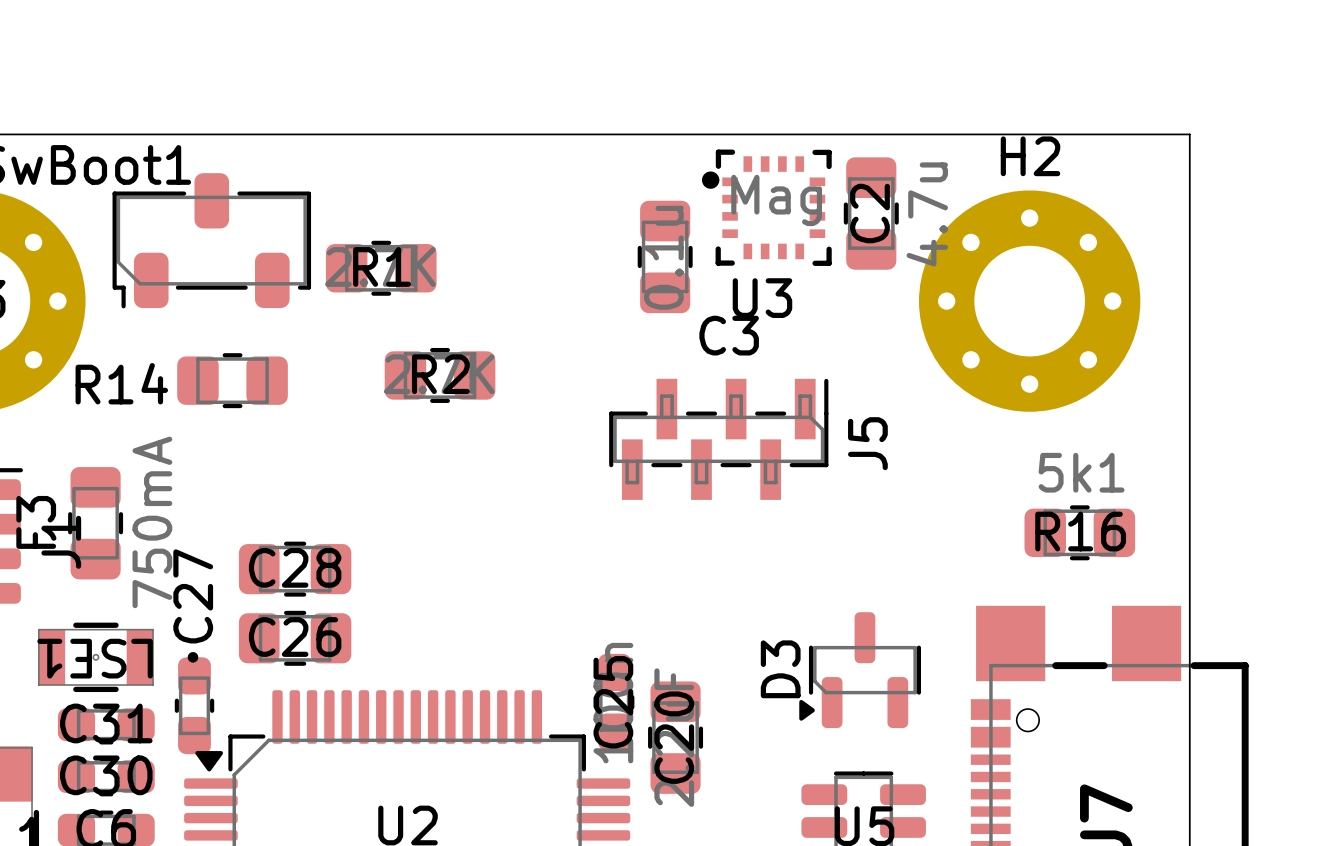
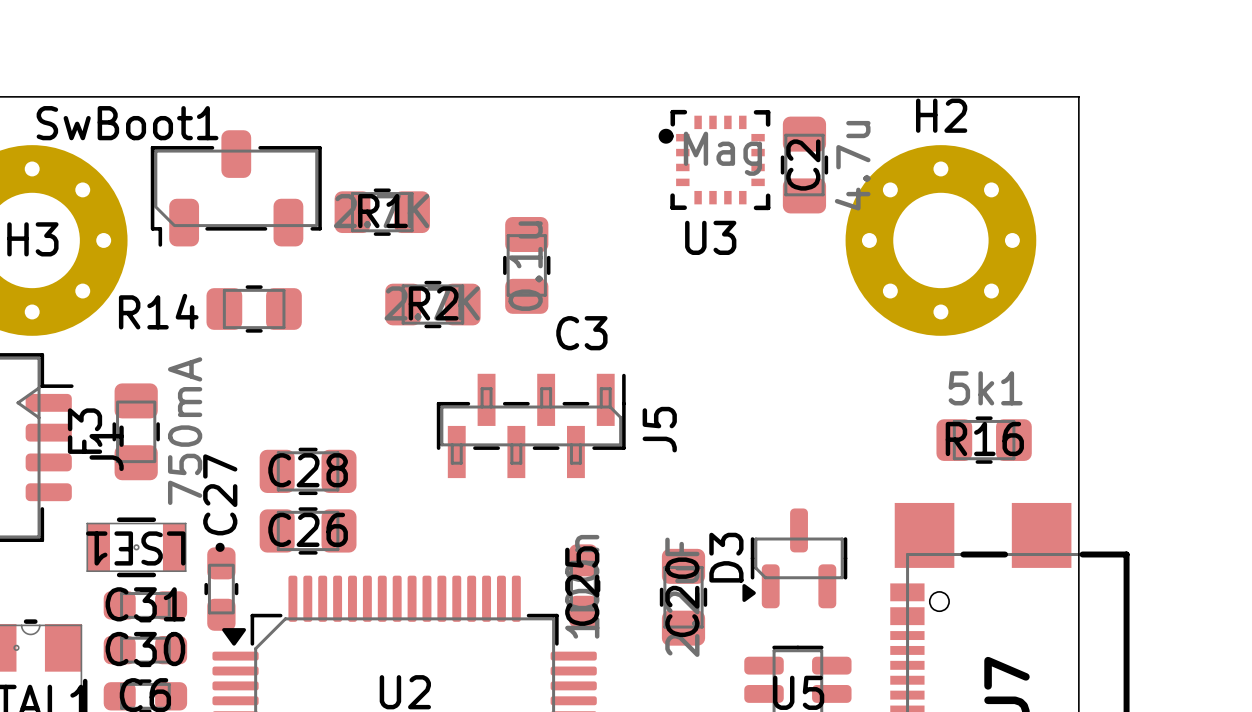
C3 position: (665, 256) -> (526, 265)
J5 position: (718, 439) -> (531, 425)
C20 position: (675, 737) -> (683, 597)

